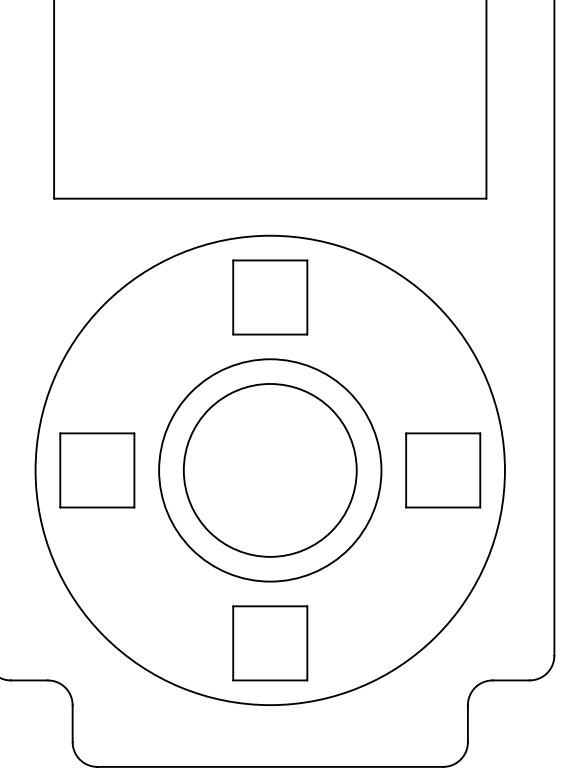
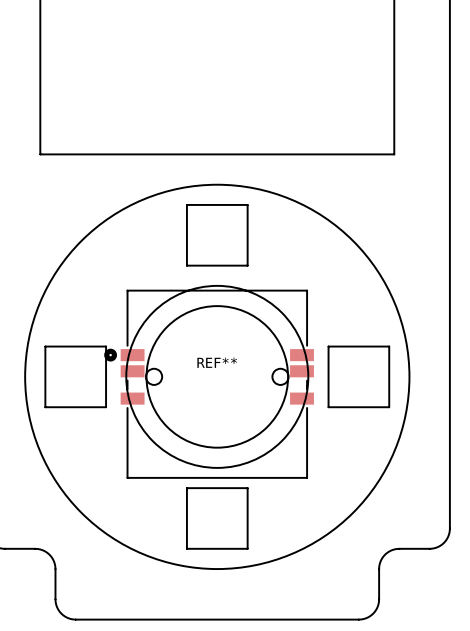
REF**: none -> (209, 384)

